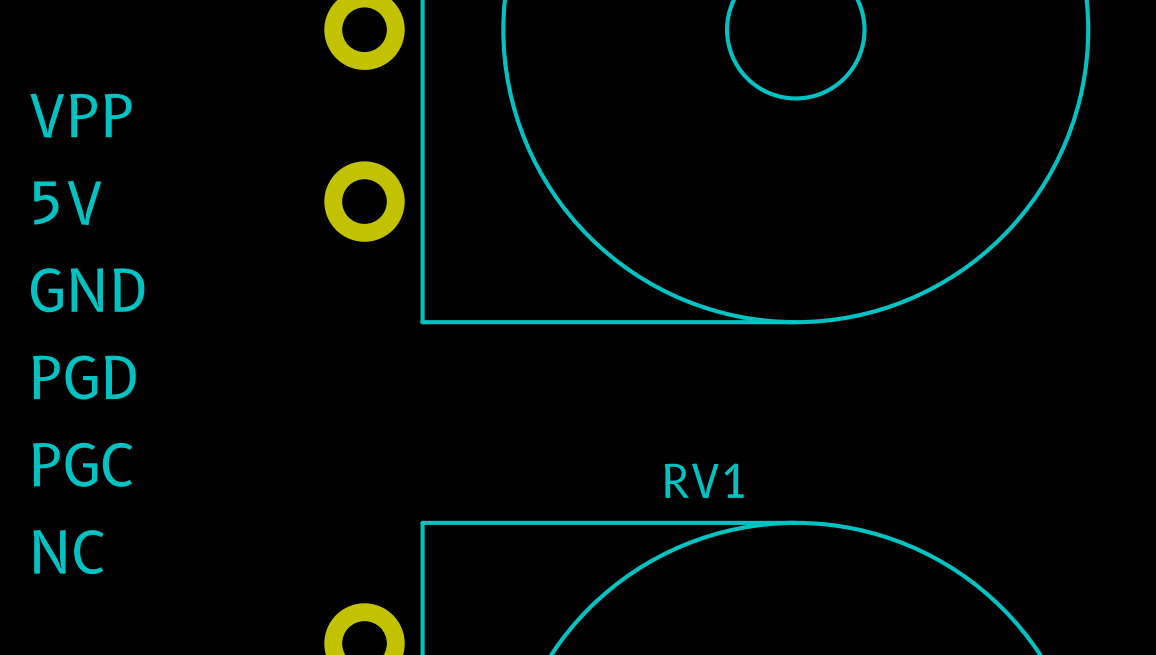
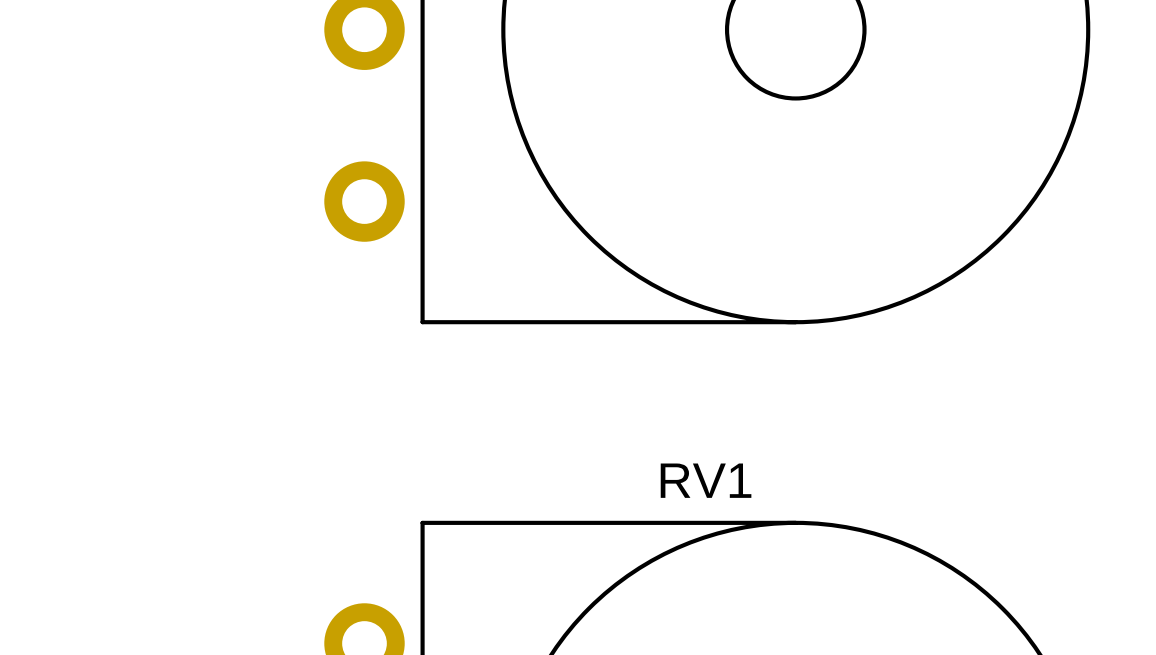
text: VPP (80, 115) -> none
text: 5V (67, 202) -> none
text: GND (87, 290) -> none
text: PGD (84, 377) -> none
text: PGC (82, 464) -> none
text: NC (68, 552) -> none

